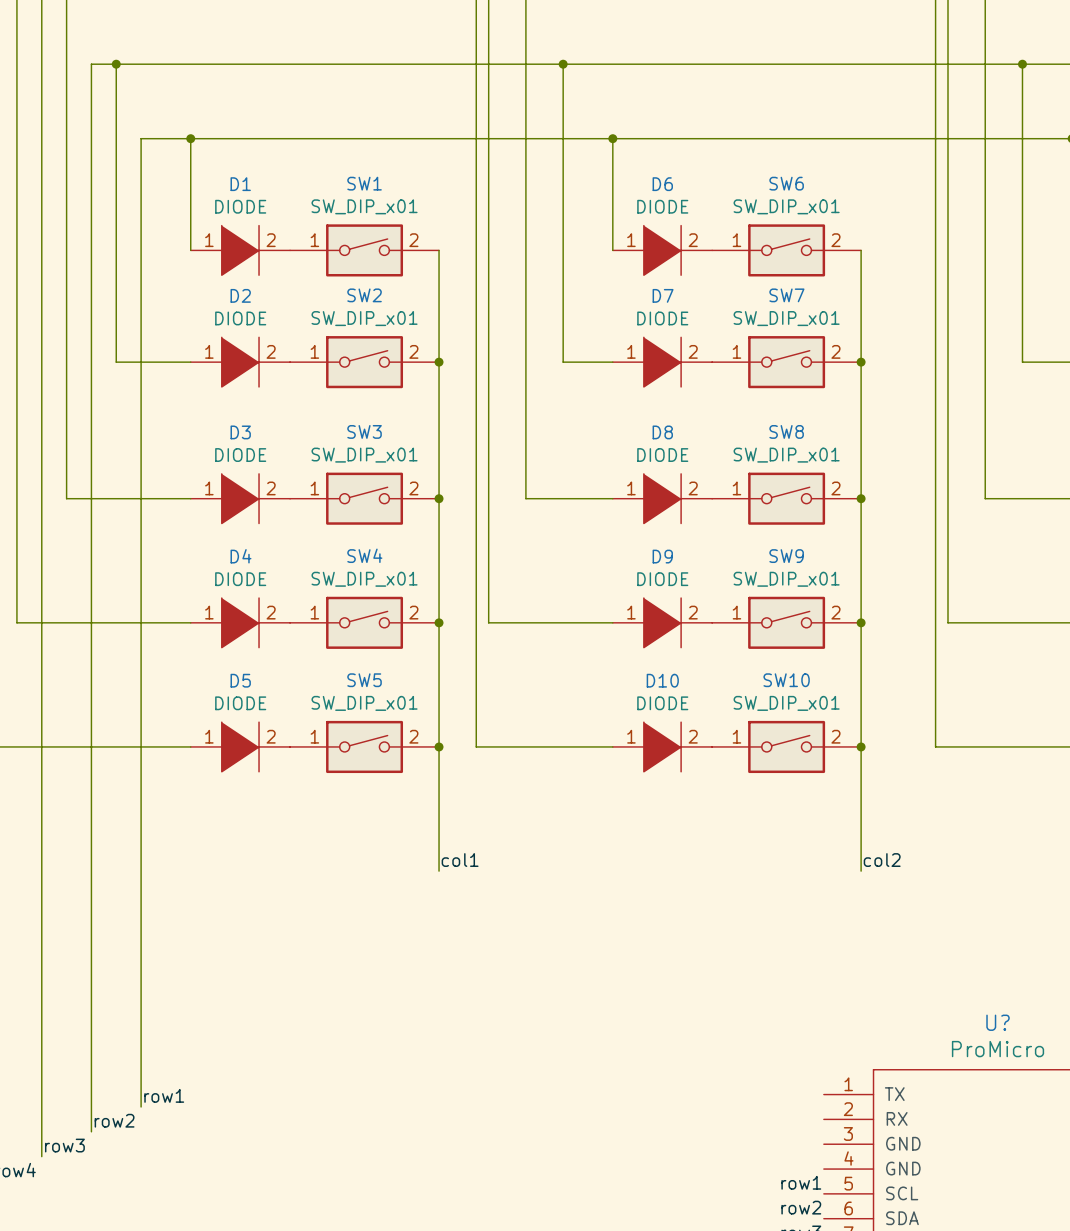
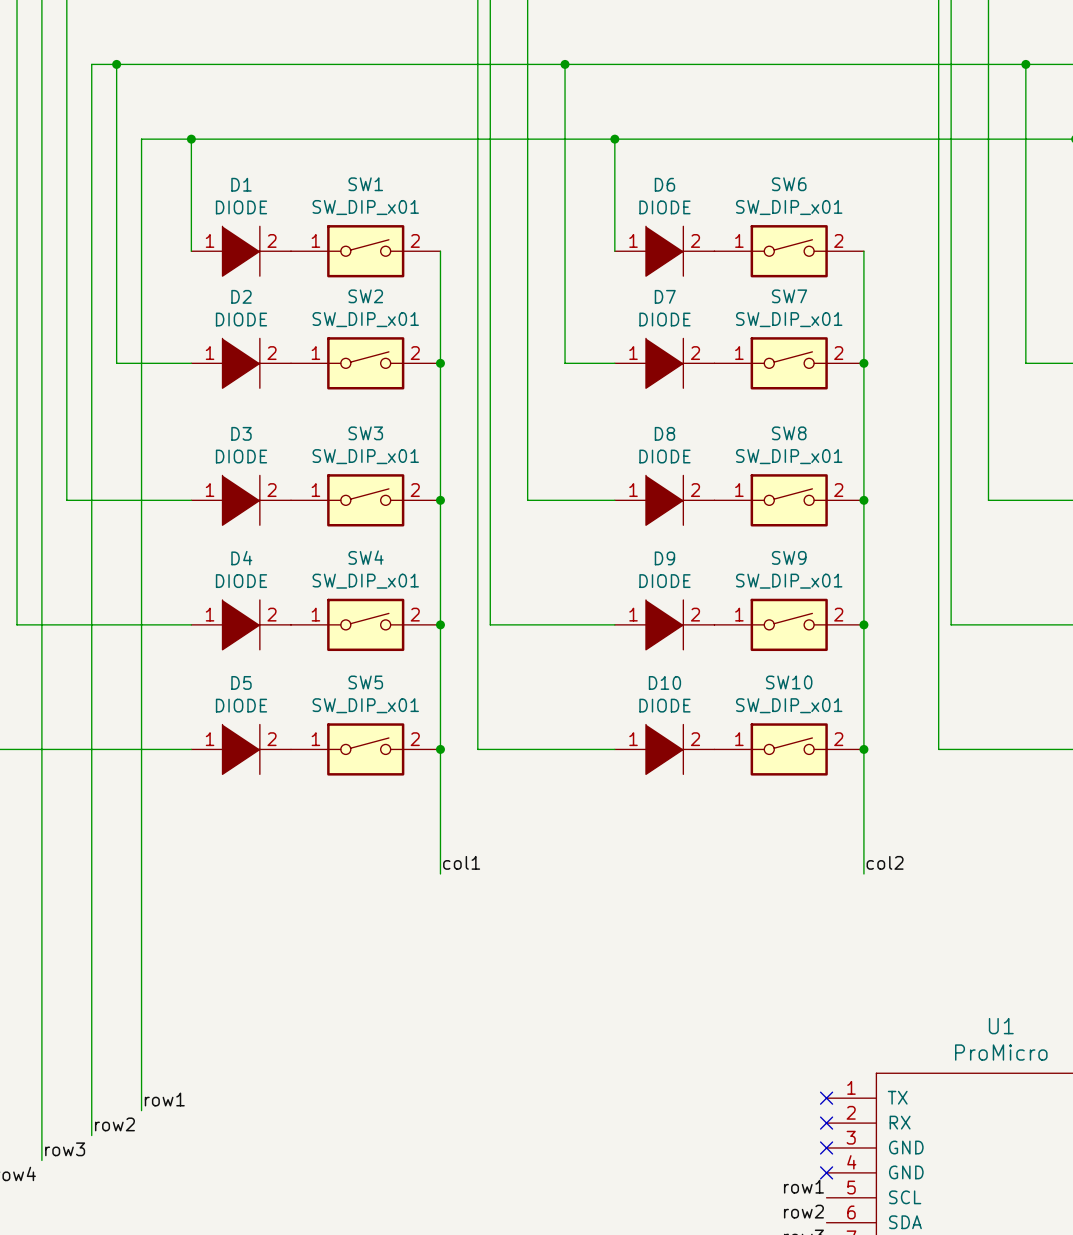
U? name: U? (998, 1022) -> U1 (1001, 1026)
no-connect mark: none -> (826, 1098)
no-connect mark: none -> (826, 1123)
no-connect mark: none -> (826, 1147)
no-connect mark: none -> (826, 1172)

